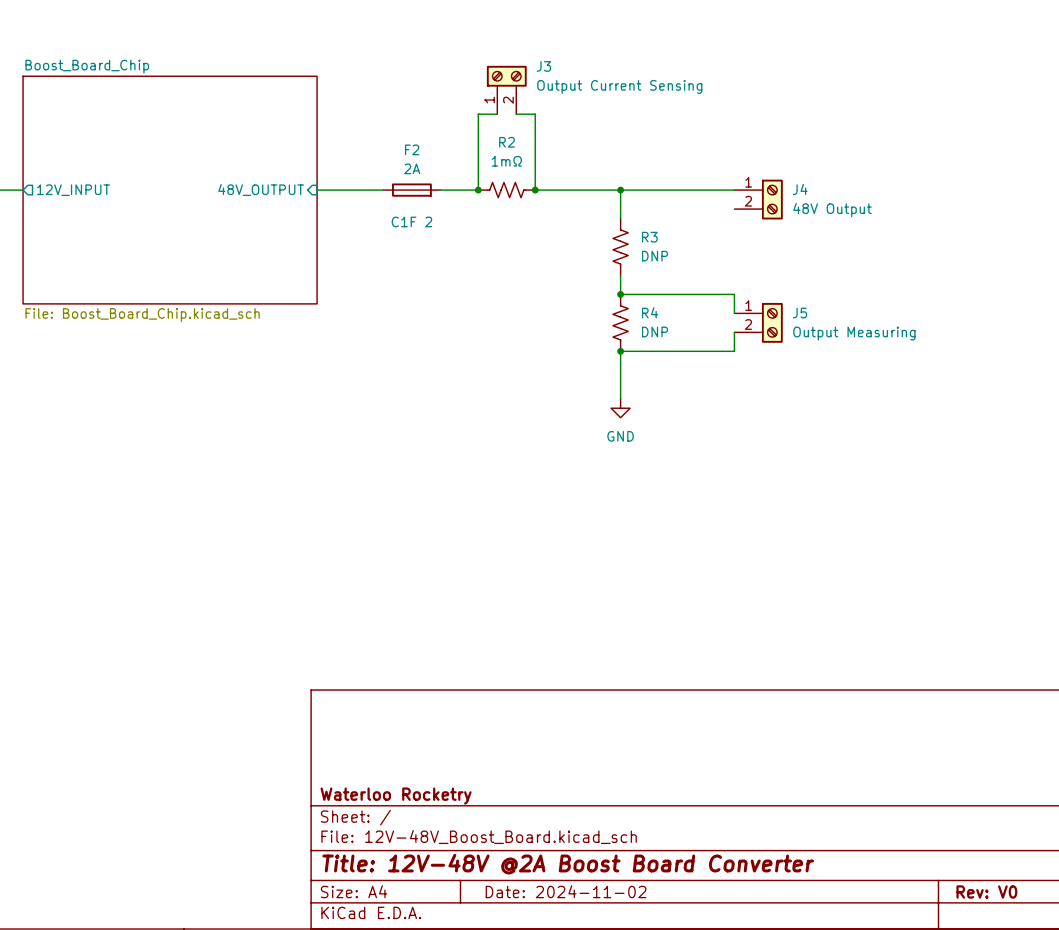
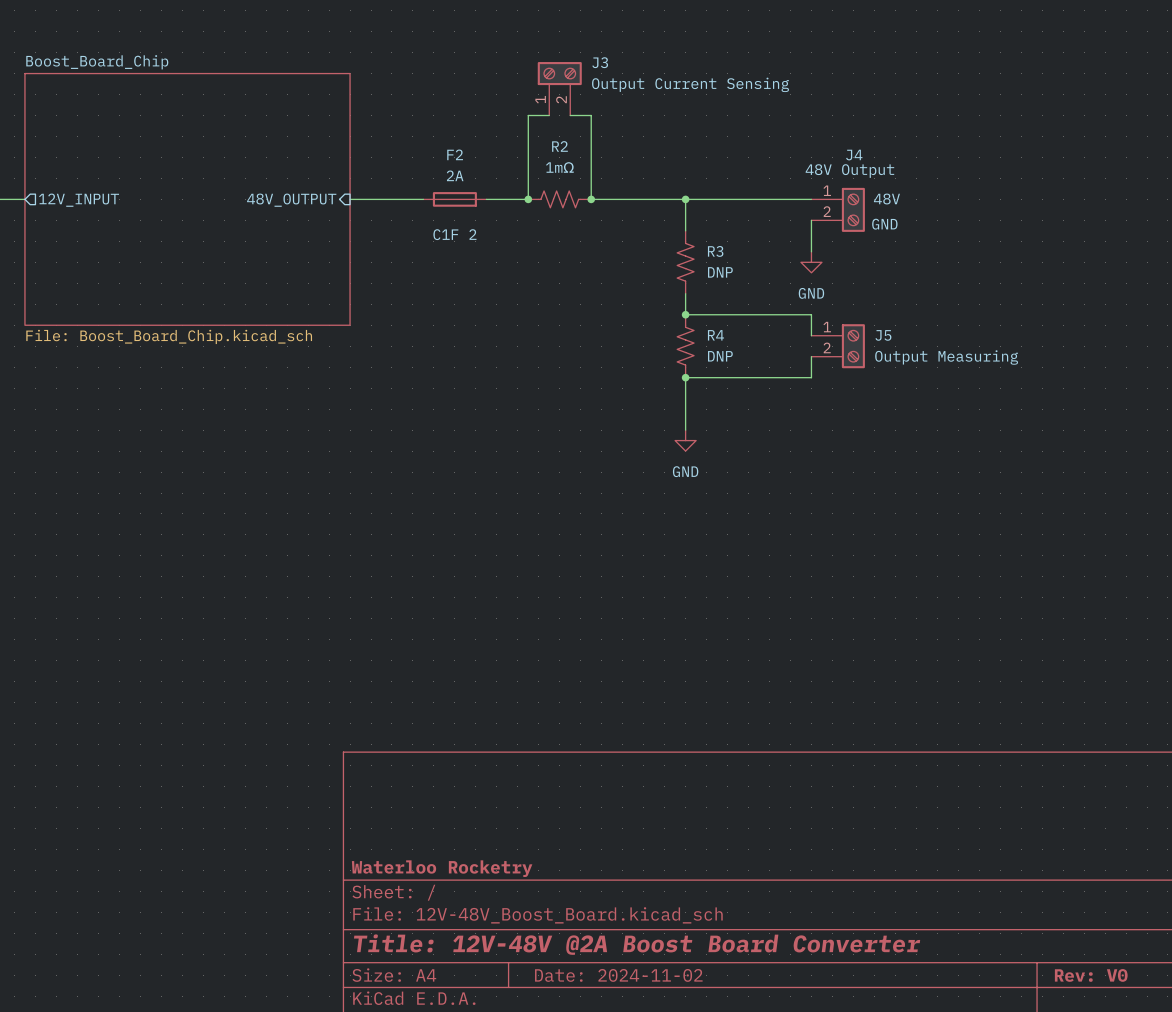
J4 name position: J4 (800, 189) -> J4 (854, 155)
J4 text: none -> 48V (886, 199)
wire: none -> (811, 220) (811, 251)
J4 value position: 48V Output (832, 210) -> 48V Output (849, 171)
J4 text: none -> GND (884, 224)
power symbol: none -> GND (811, 262)

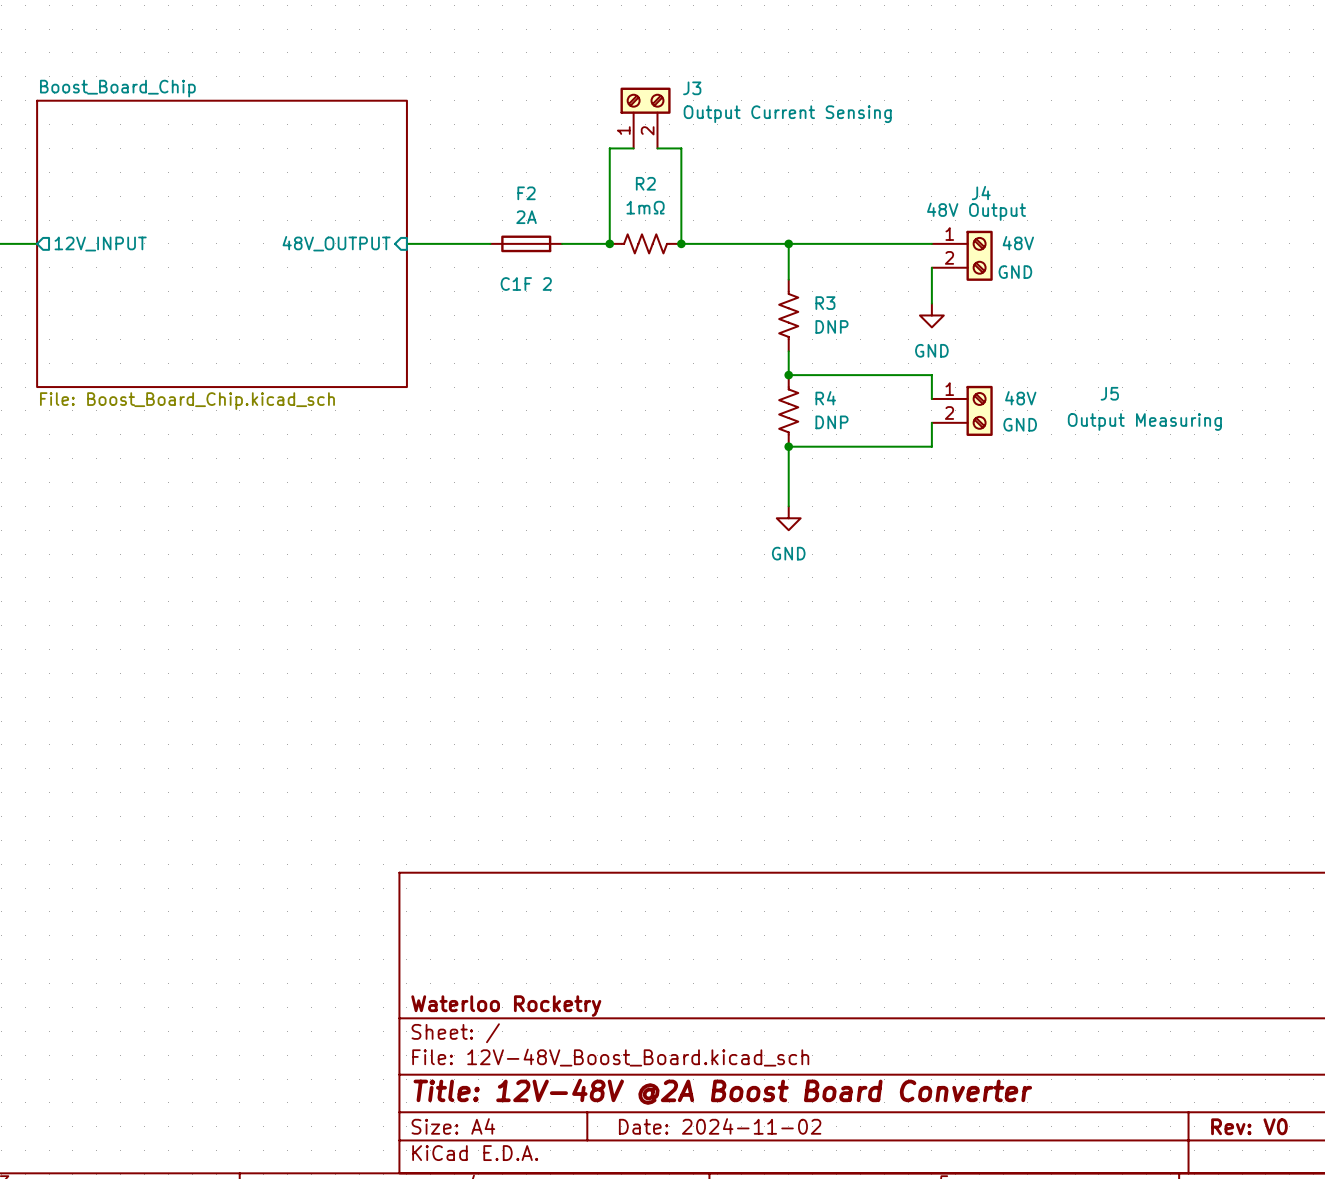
J5 name position: J5 (883, 335) -> J5 (1109, 393)
J5 text: none -> 48V (1020, 398)
J5 value position: Output Measuring (946, 357) -> Output Measuring (1144, 421)
J5 text: none -> GND (1020, 424)

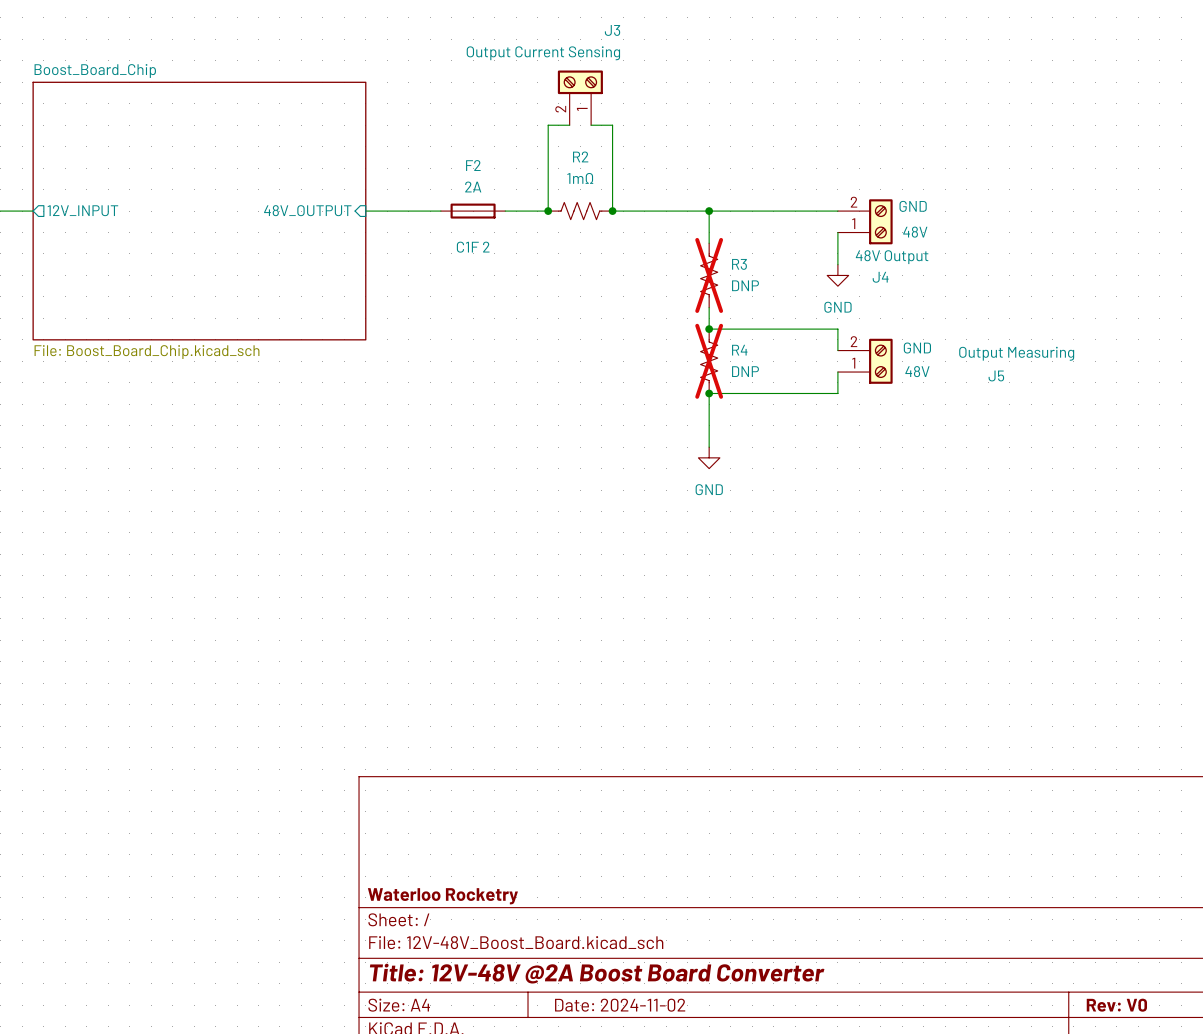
J3 name position: J3 (692, 88) -> J3 (612, 30)
J3 flip: as is (645, 100) -> left-right (580, 82)
J3 value position: Output Current Sensing (787, 114) -> Output Current Sensing (543, 53)
J4 value position: 48V Output (976, 211) -> 48V Output (892, 257)
J4 flip: as is (979, 255) -> up-down (880, 221)
R3 do-not-place cross: none -> (709, 275)
R4 do-not-place cross: none -> (709, 361)
J5 flip: as is (979, 410) -> up-down (880, 361)

